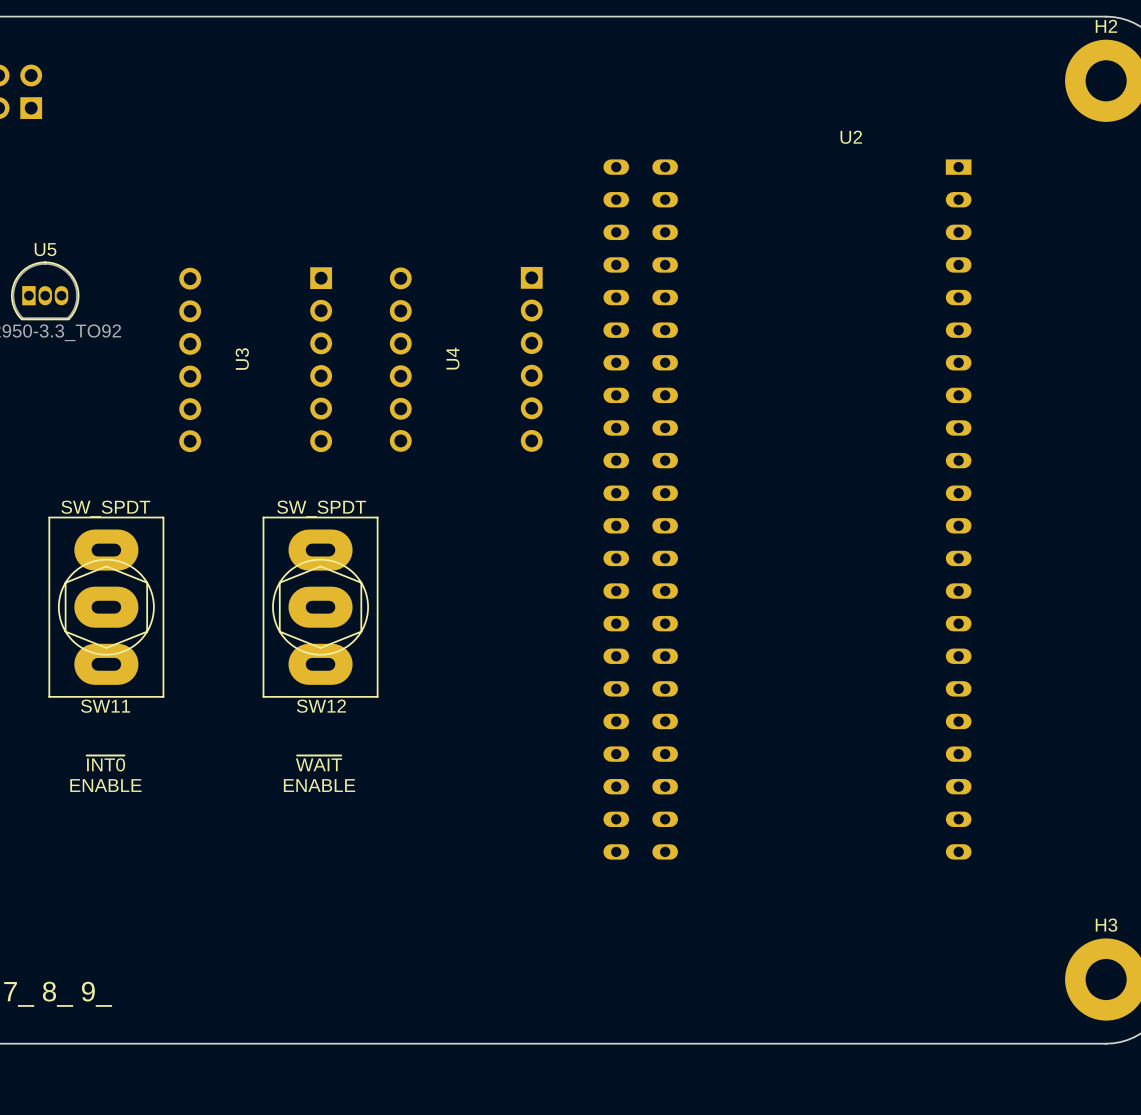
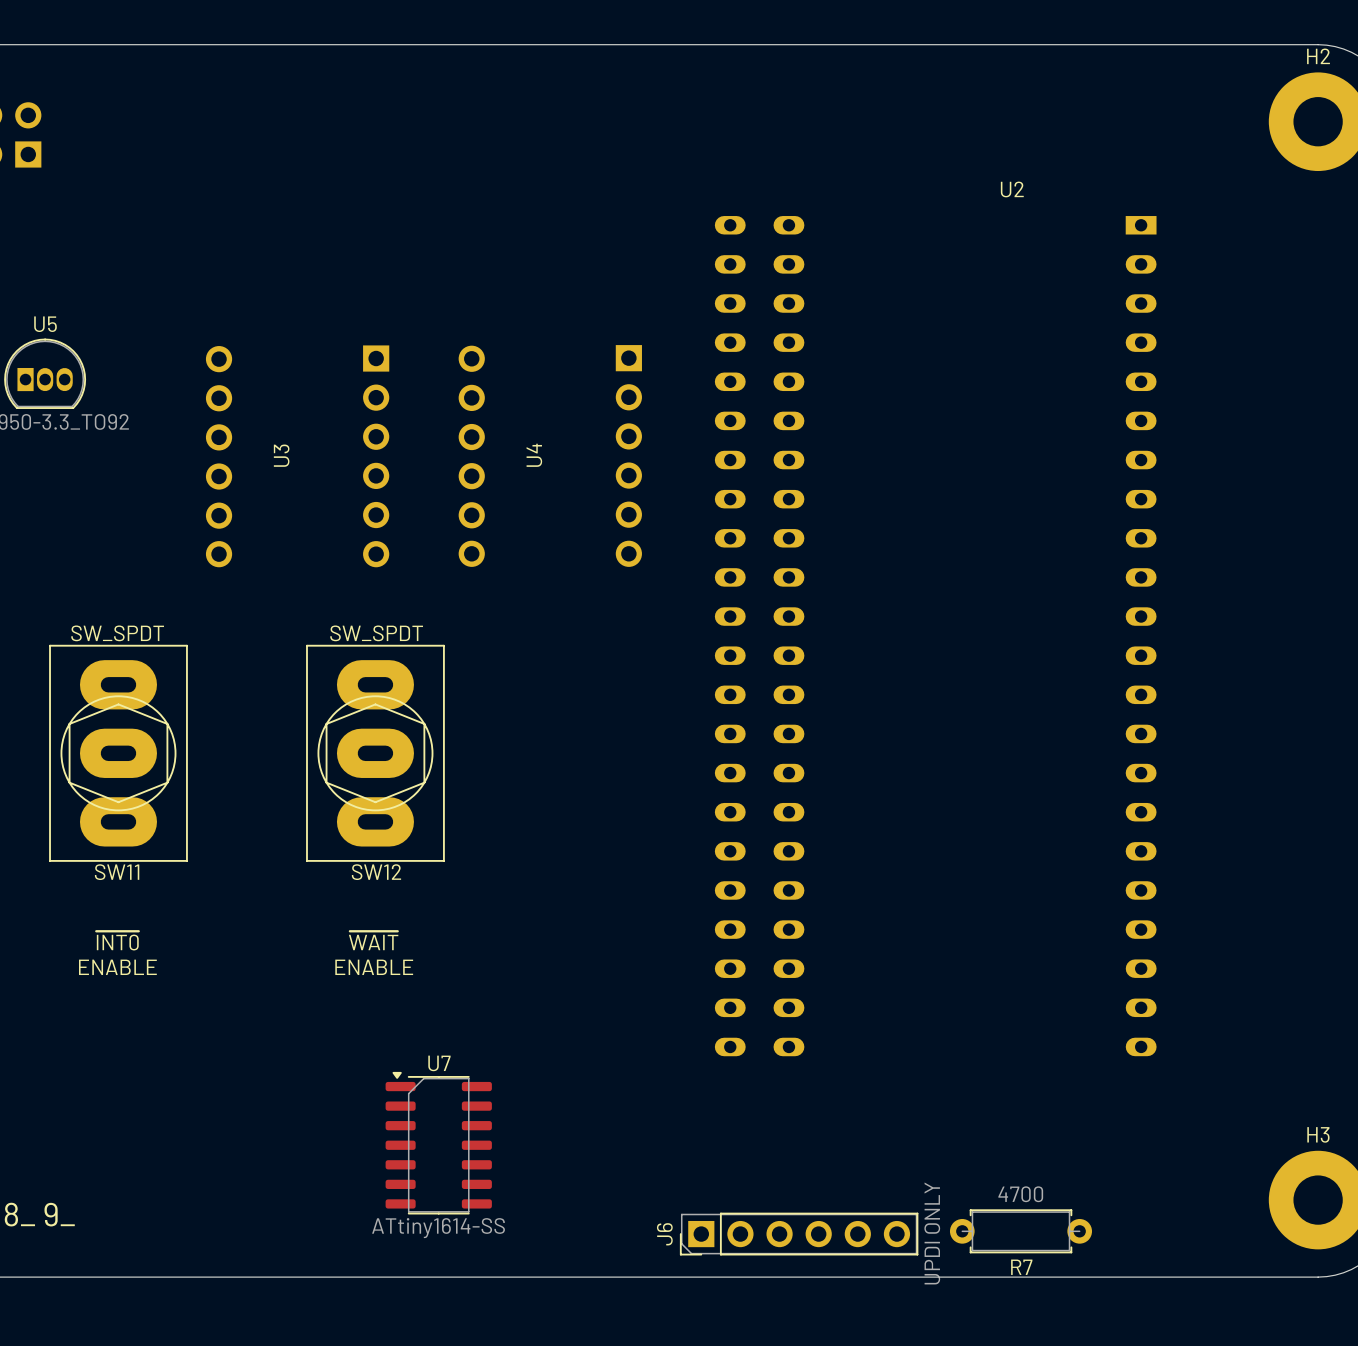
U7: none -> ATtiny1614-SS (438, 1143)
R7: none -> 4700 (1020, 1231)
J6: none -> UPDI ONLY (799, 1234)

